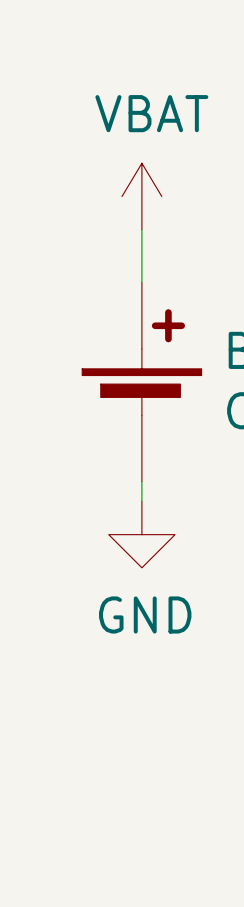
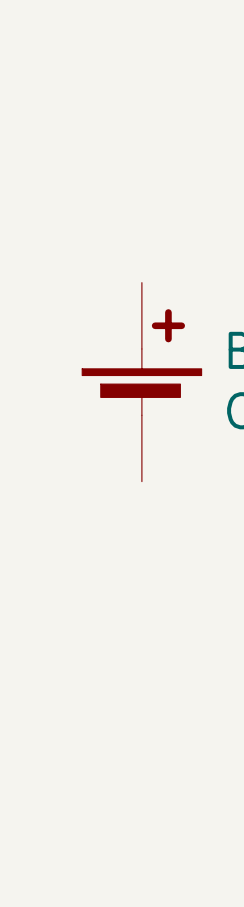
power symbol: VBAT (141, 196) -> none
wire: (141, 229) (141, 282) -> none
wire: (141, 481) (141, 501) -> none
power symbol: GND (141, 534) -> none

